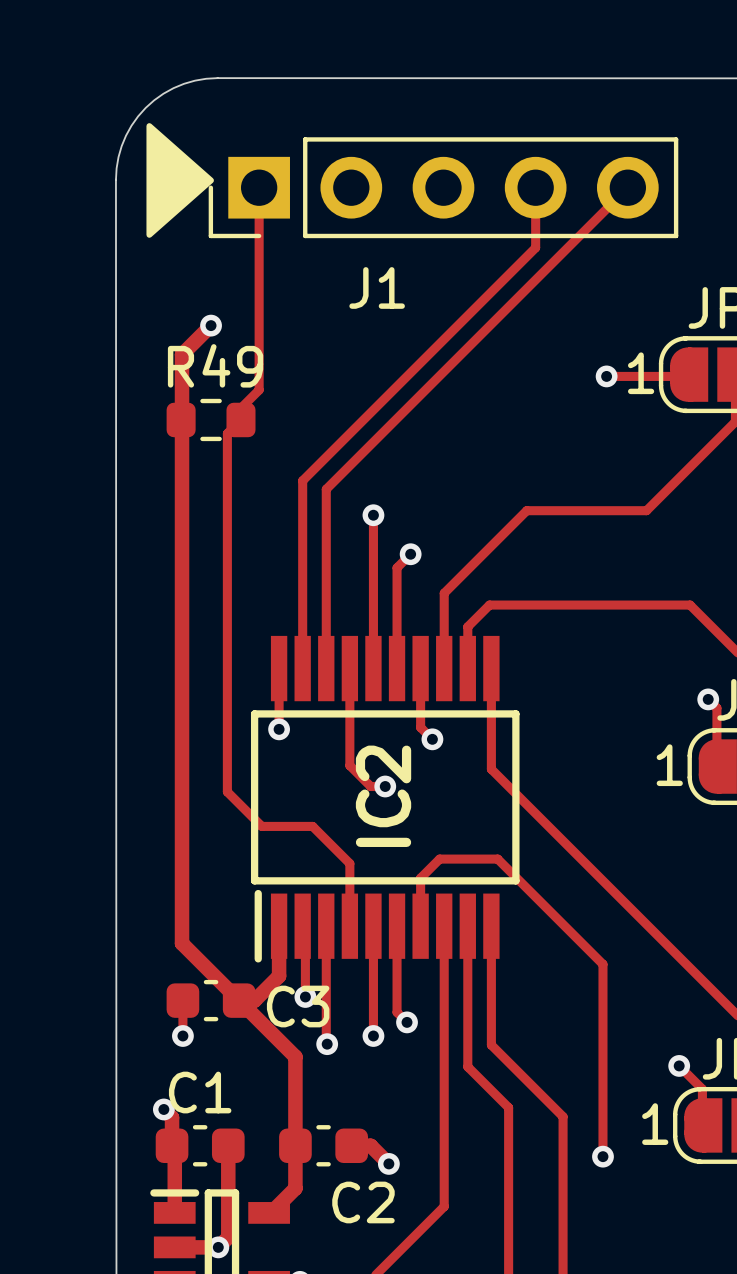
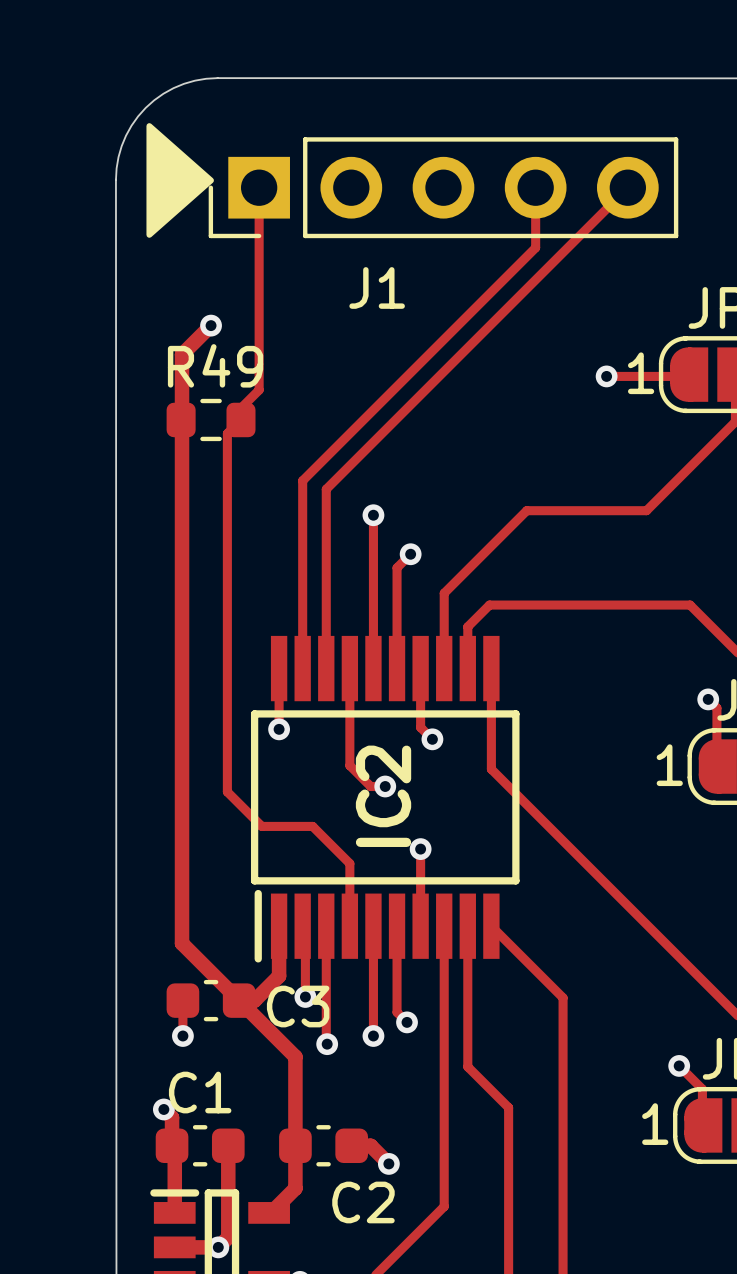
via: none -> (420, 849)
track: (420, 878) (439, 859) (497, 859) (602, 964) (602, 1156) -> (420, 878) (420, 849)
track: (491, 926) (491, 1045) (563, 1116) -> (491, 926) (563, 997) (563, 1116)
via: (602, 1156) -> none

